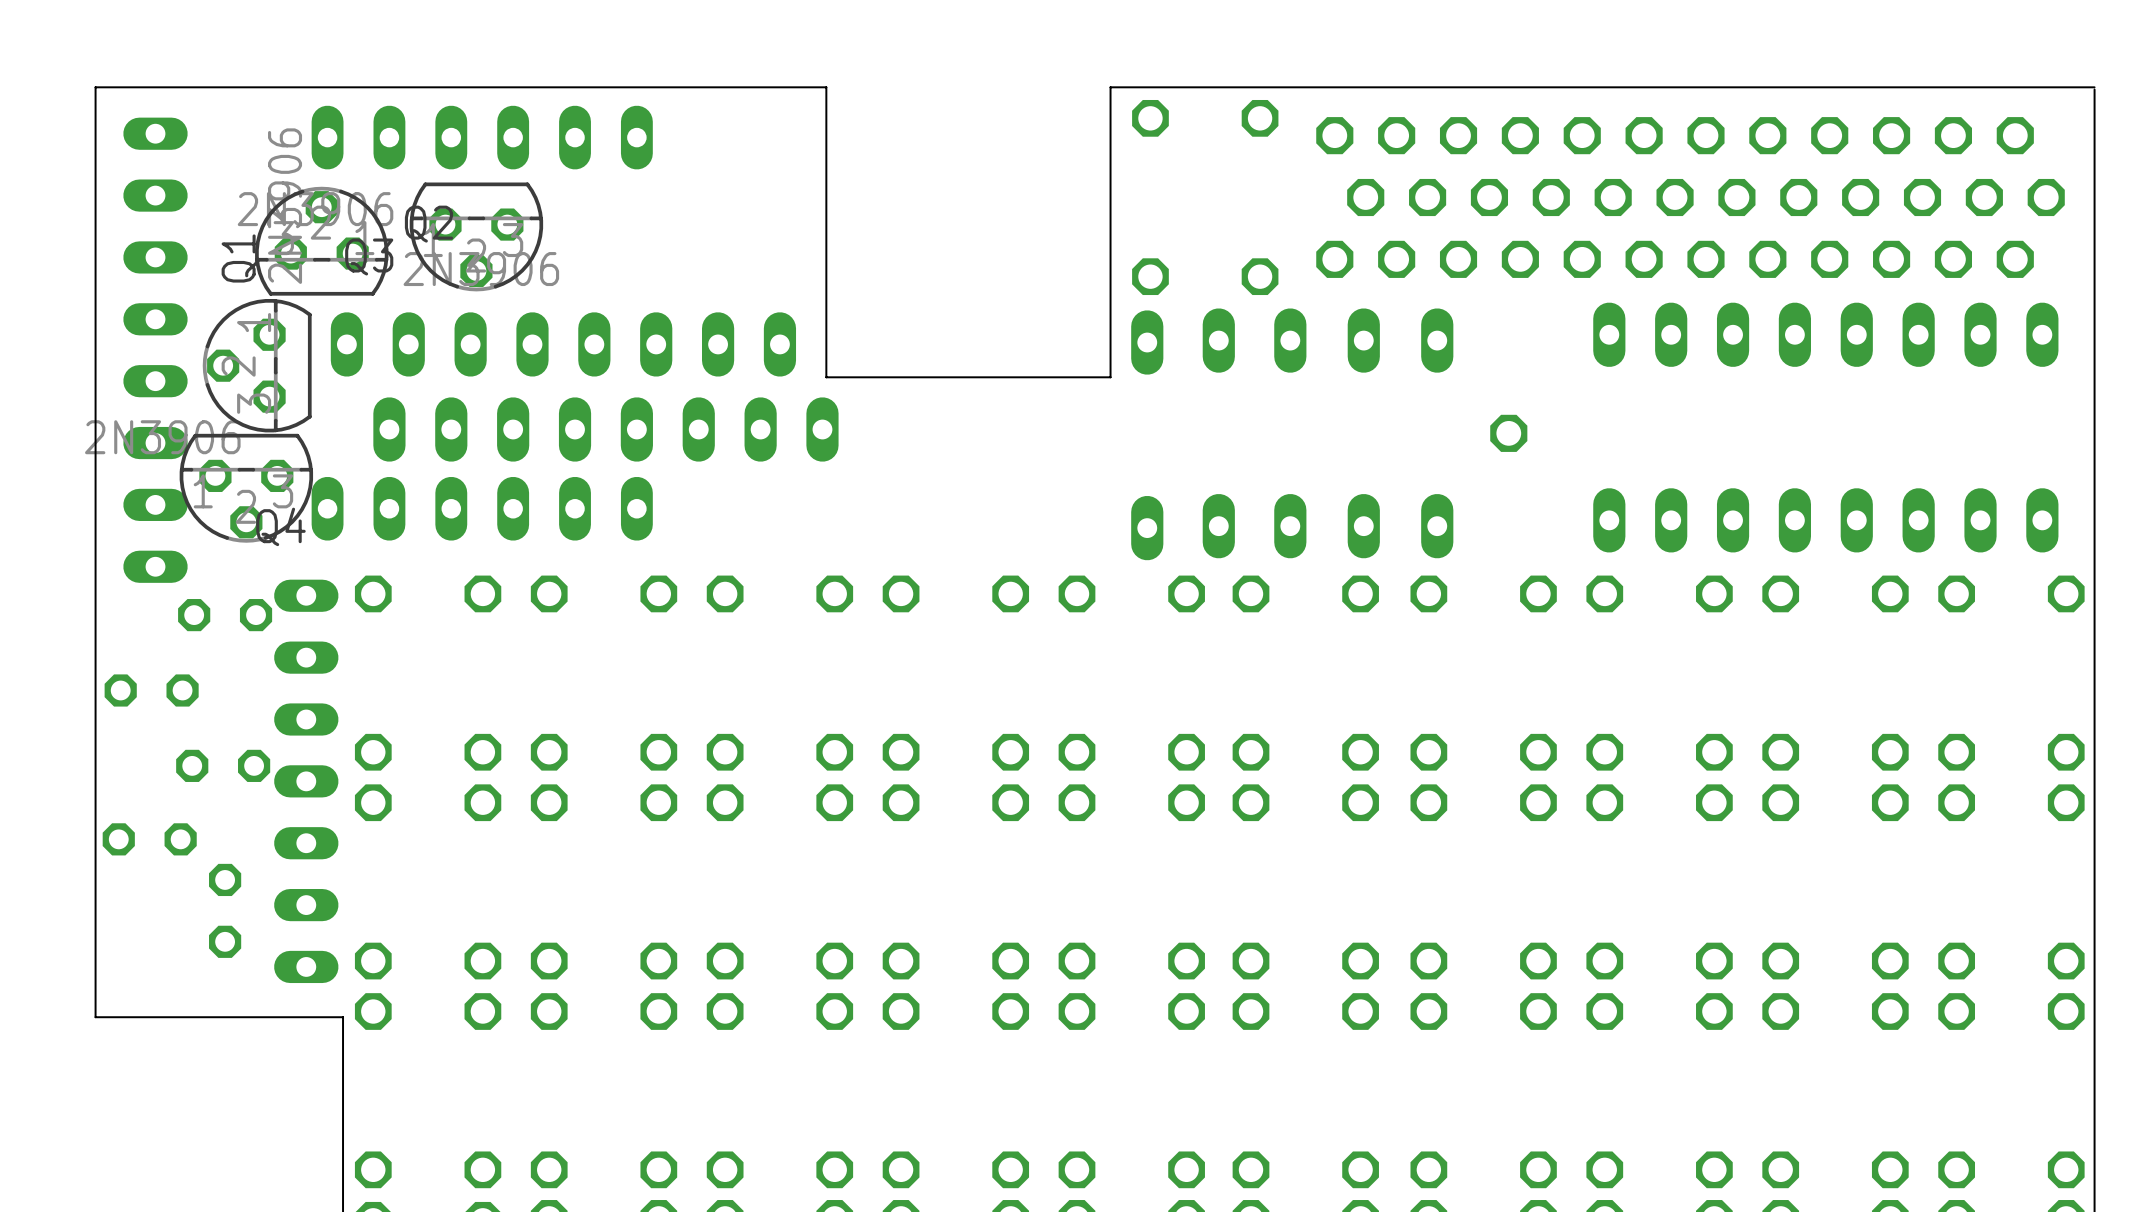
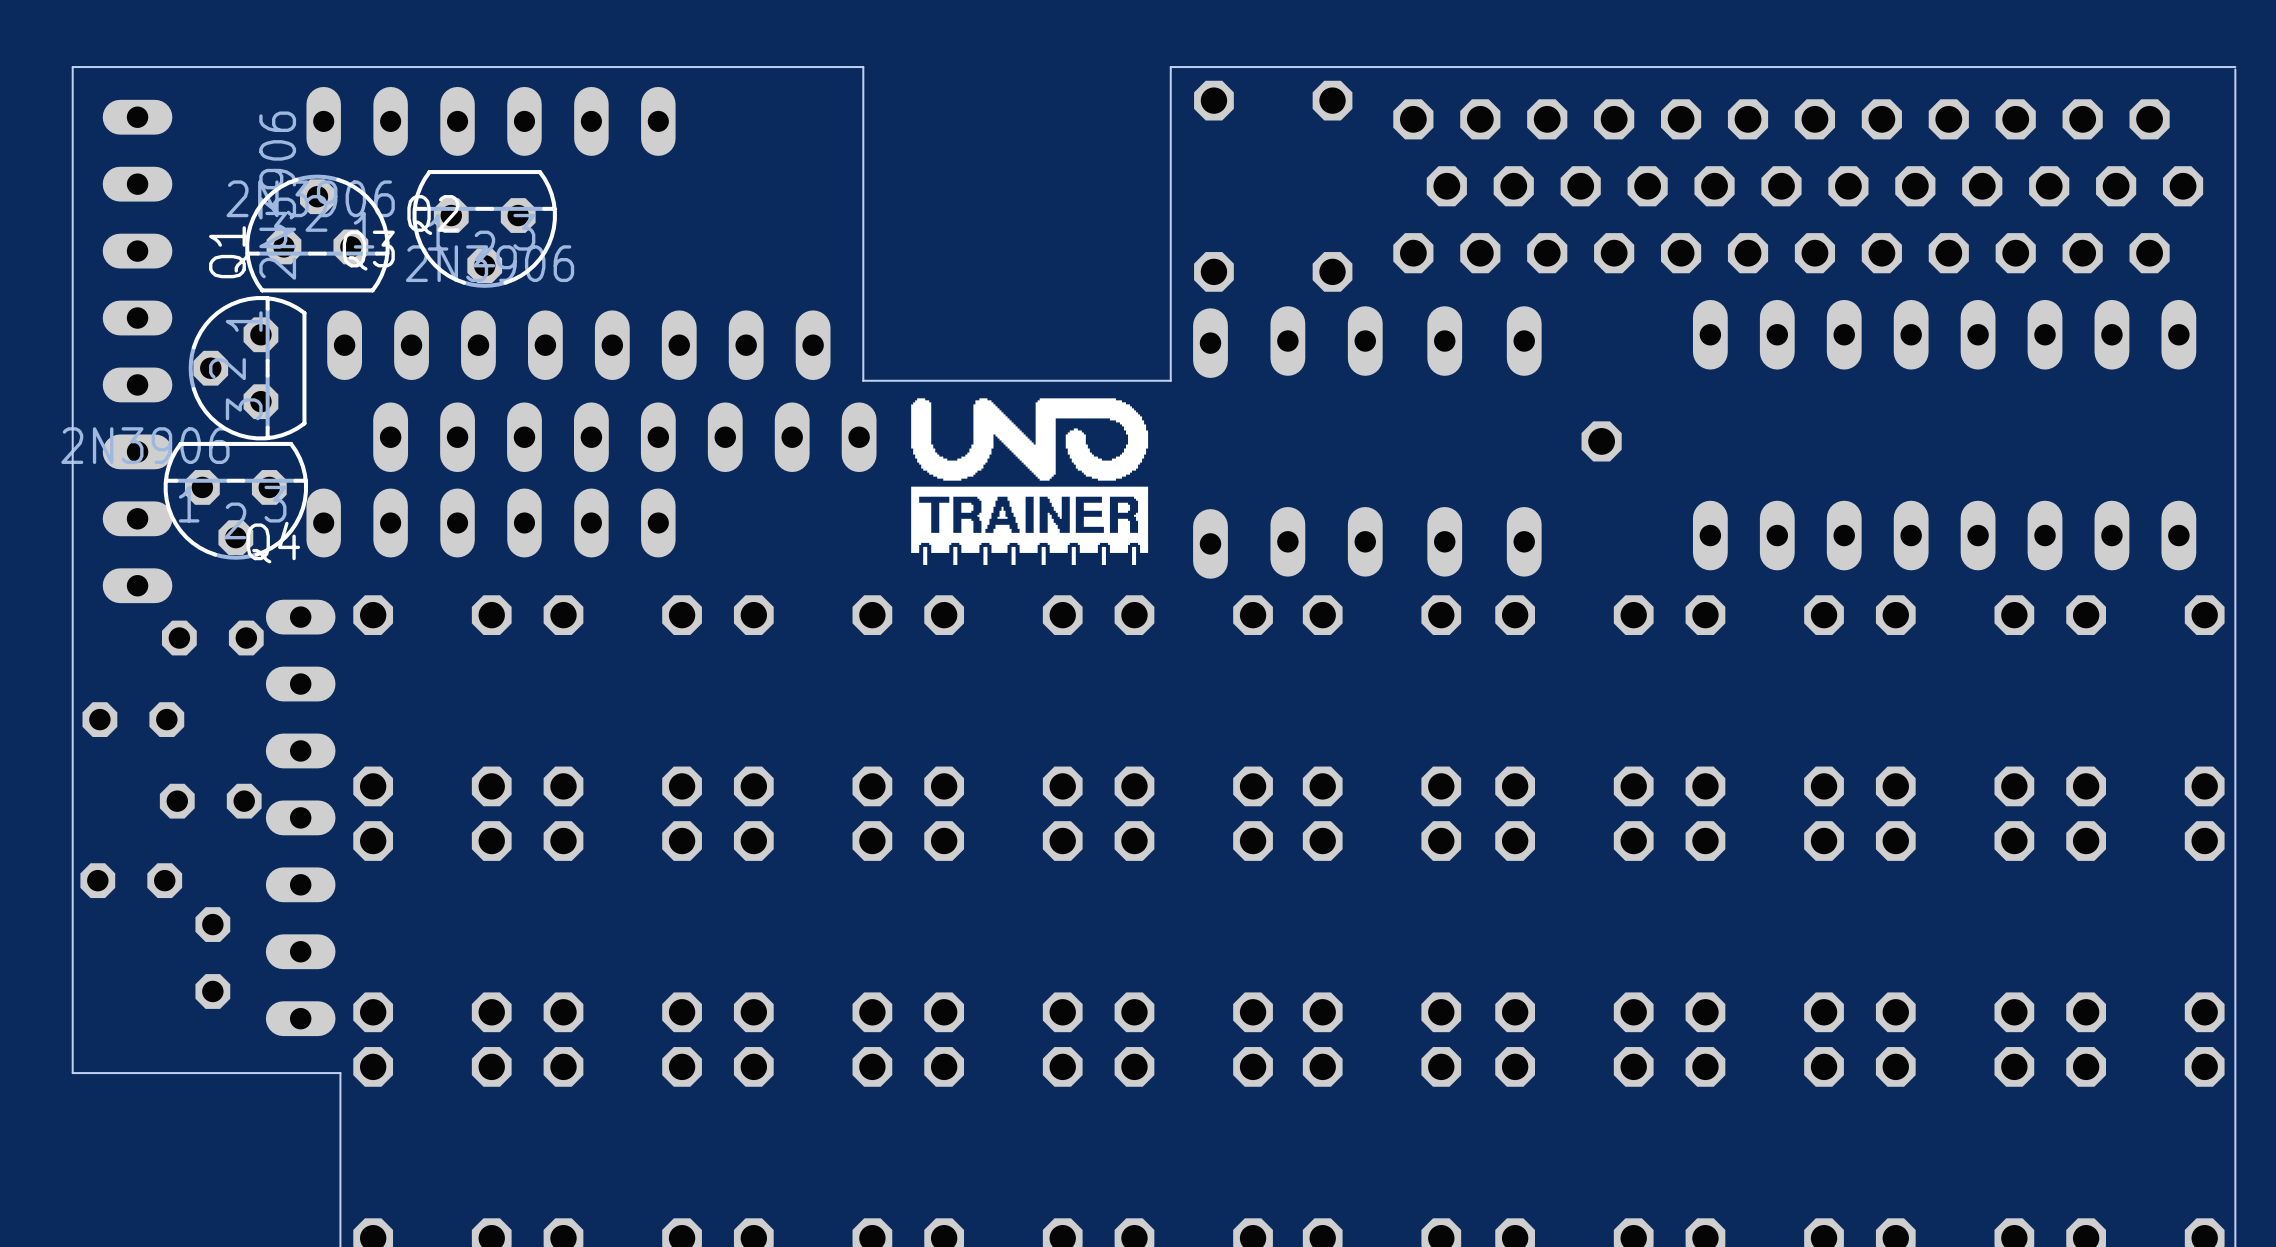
drawing: none -> [911, 398, 1149, 565]

